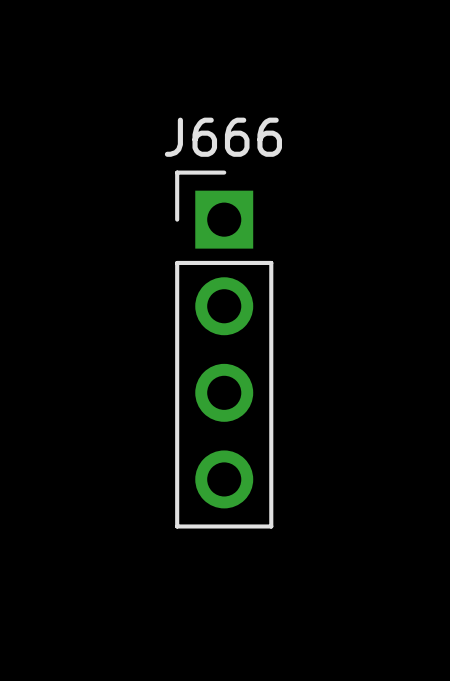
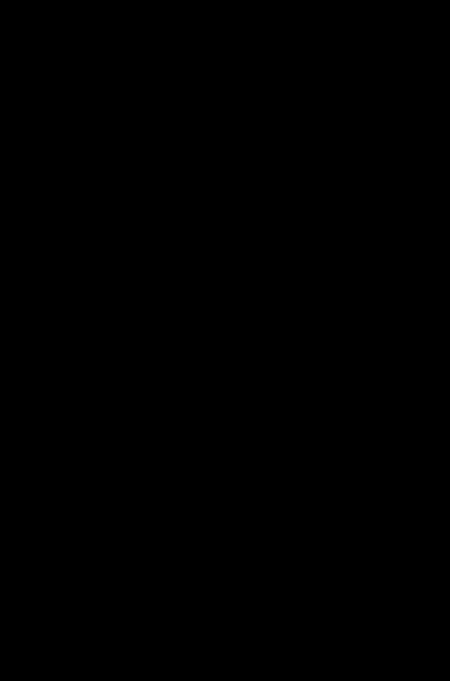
J666: (224, 349) -> none

